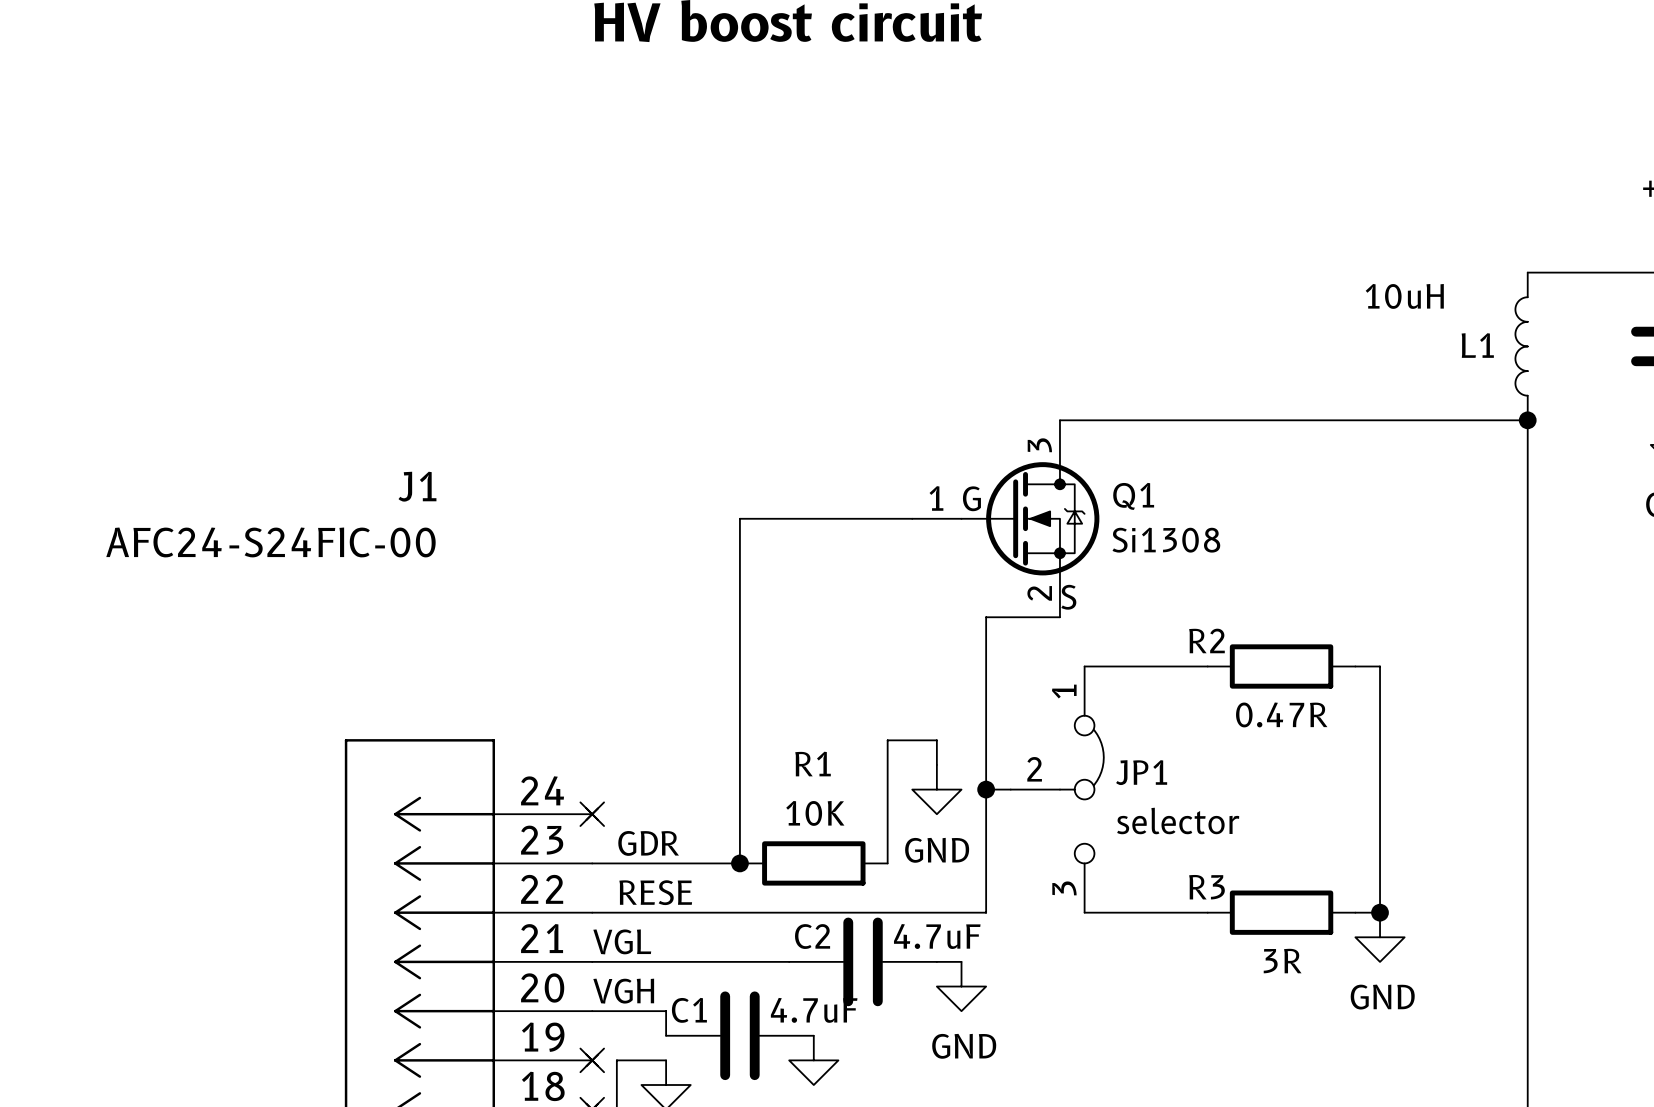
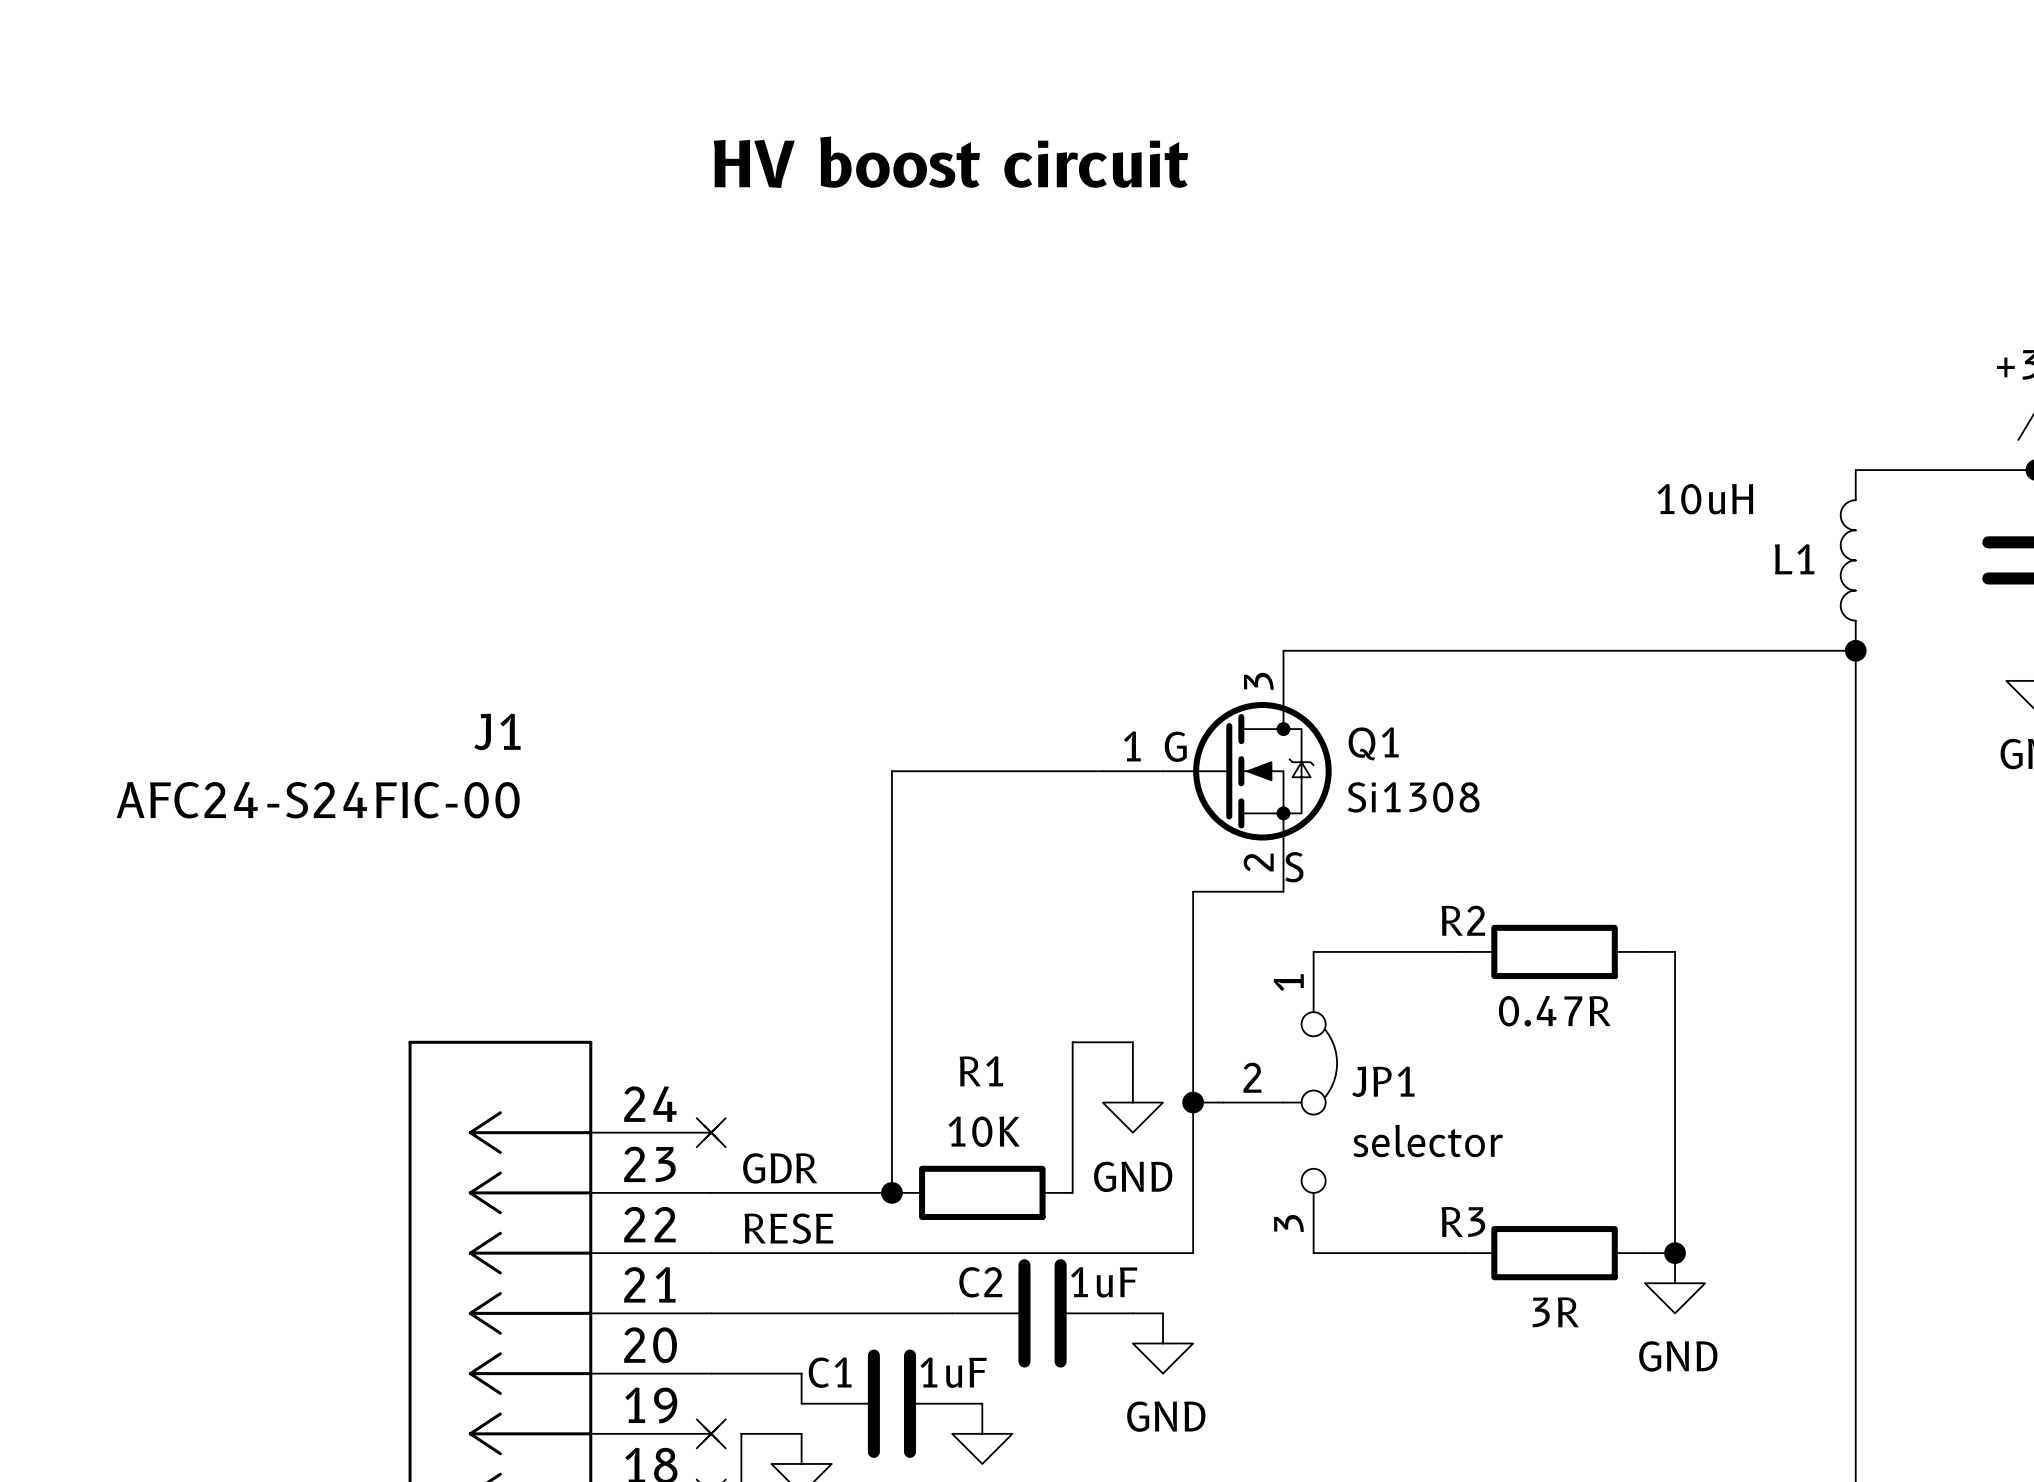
C2 value: 4.7uF (937, 936) -> 1uF (1104, 1282)
text: VGL (622, 941) -> none
text: VGH (623, 991) -> none
C1 value: 4.7uF (814, 1010) -> 1uF (953, 1372)

